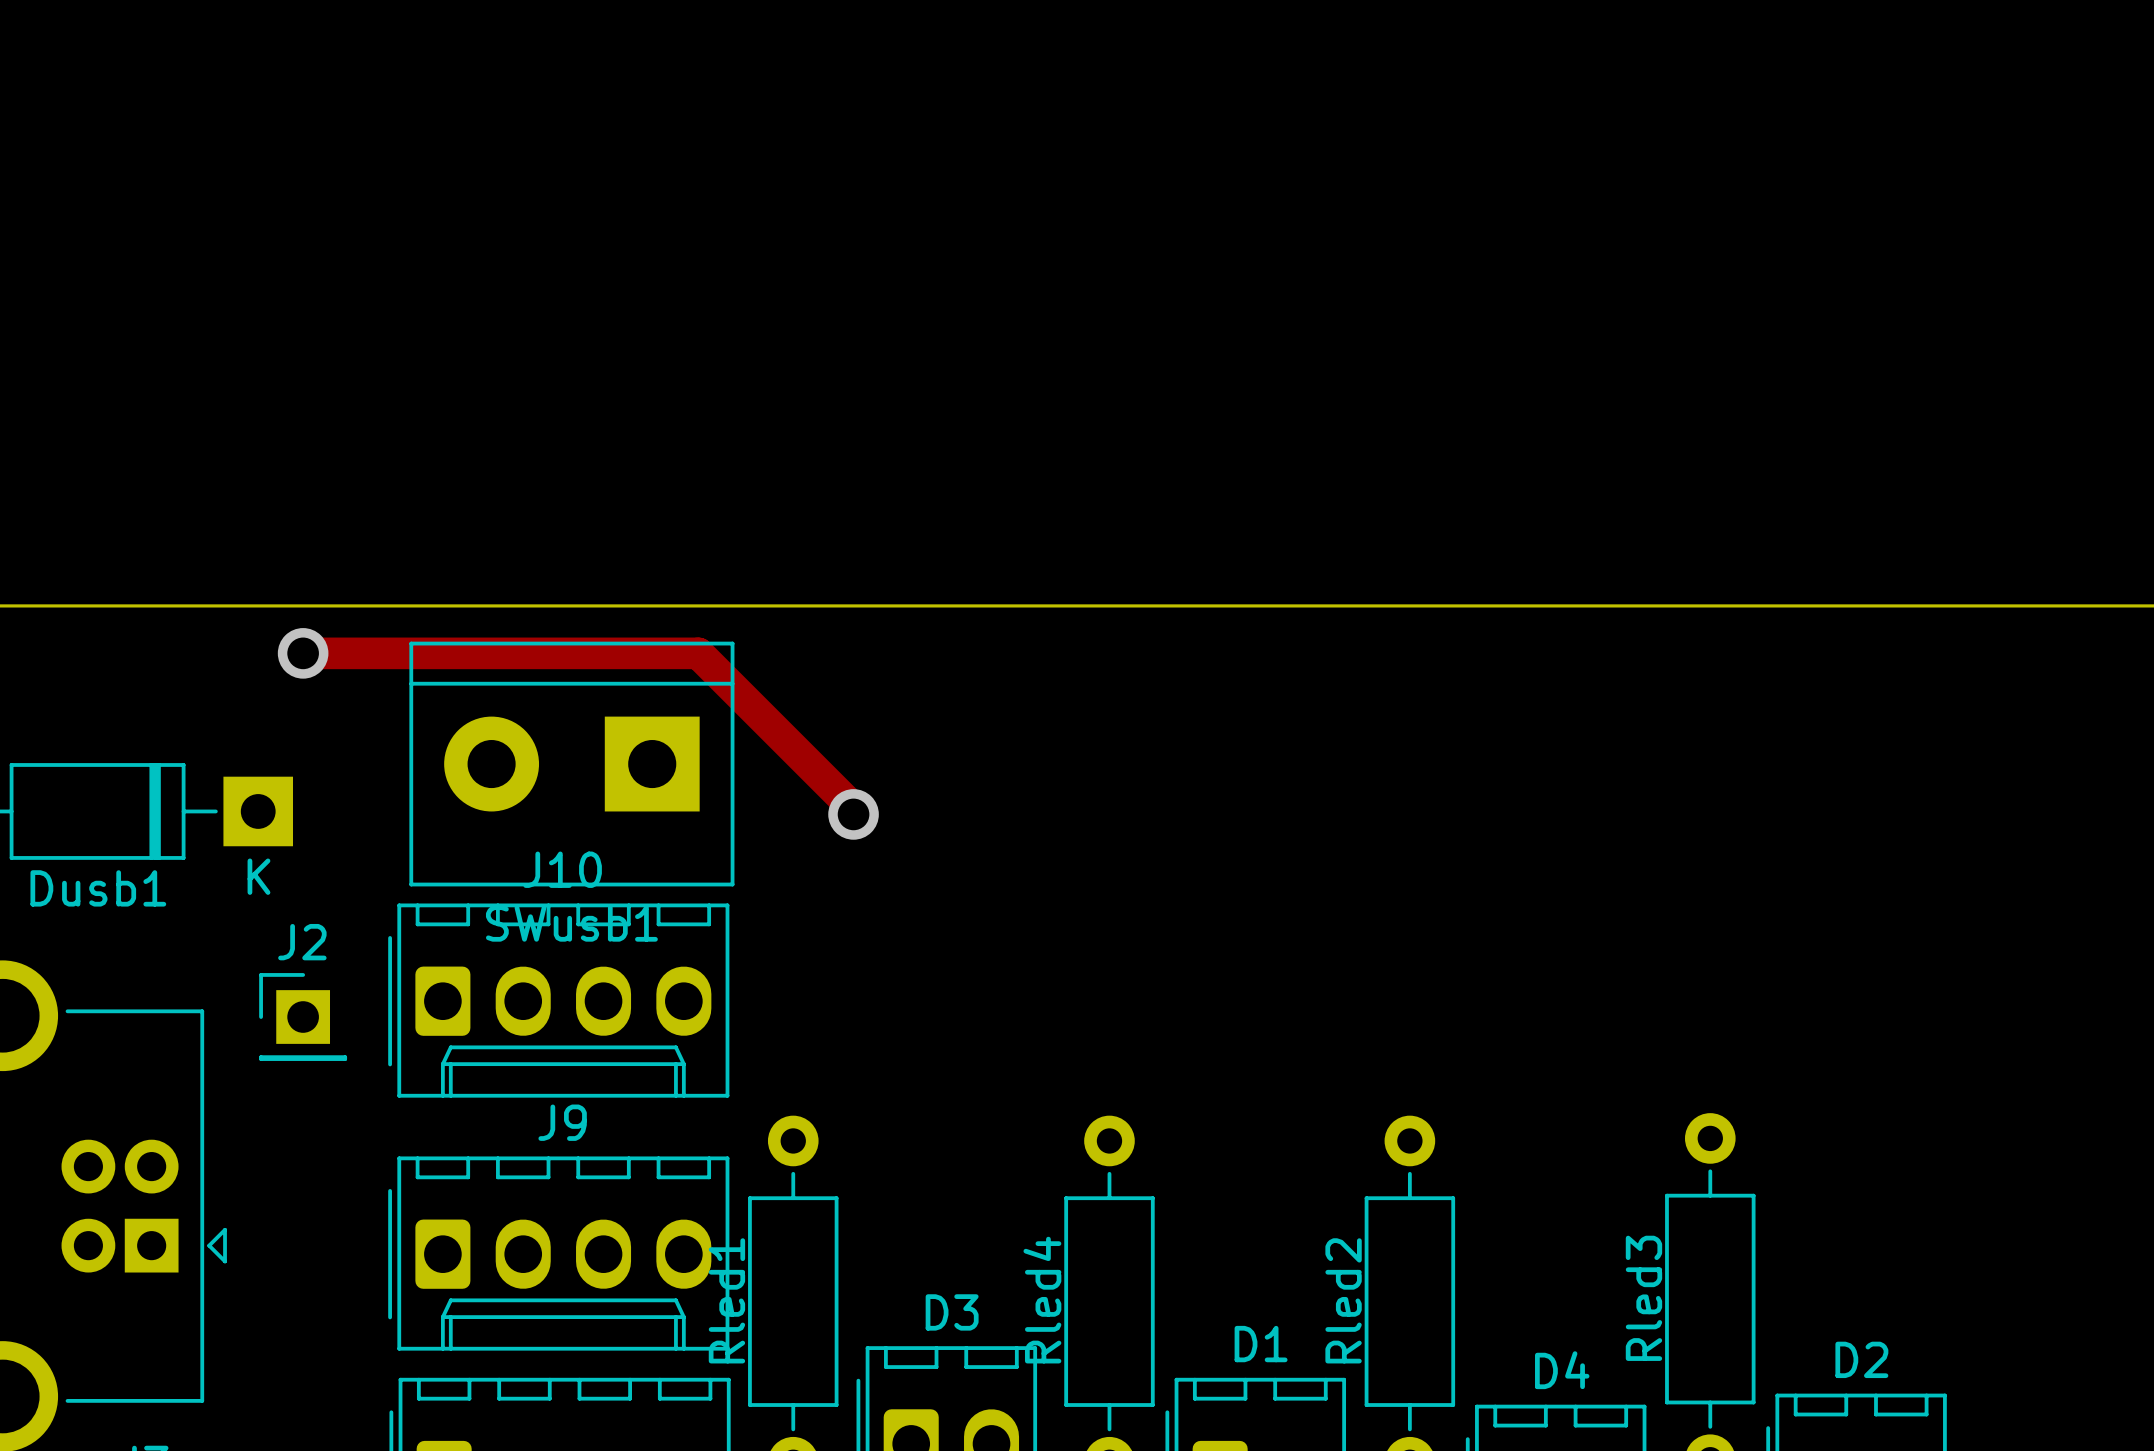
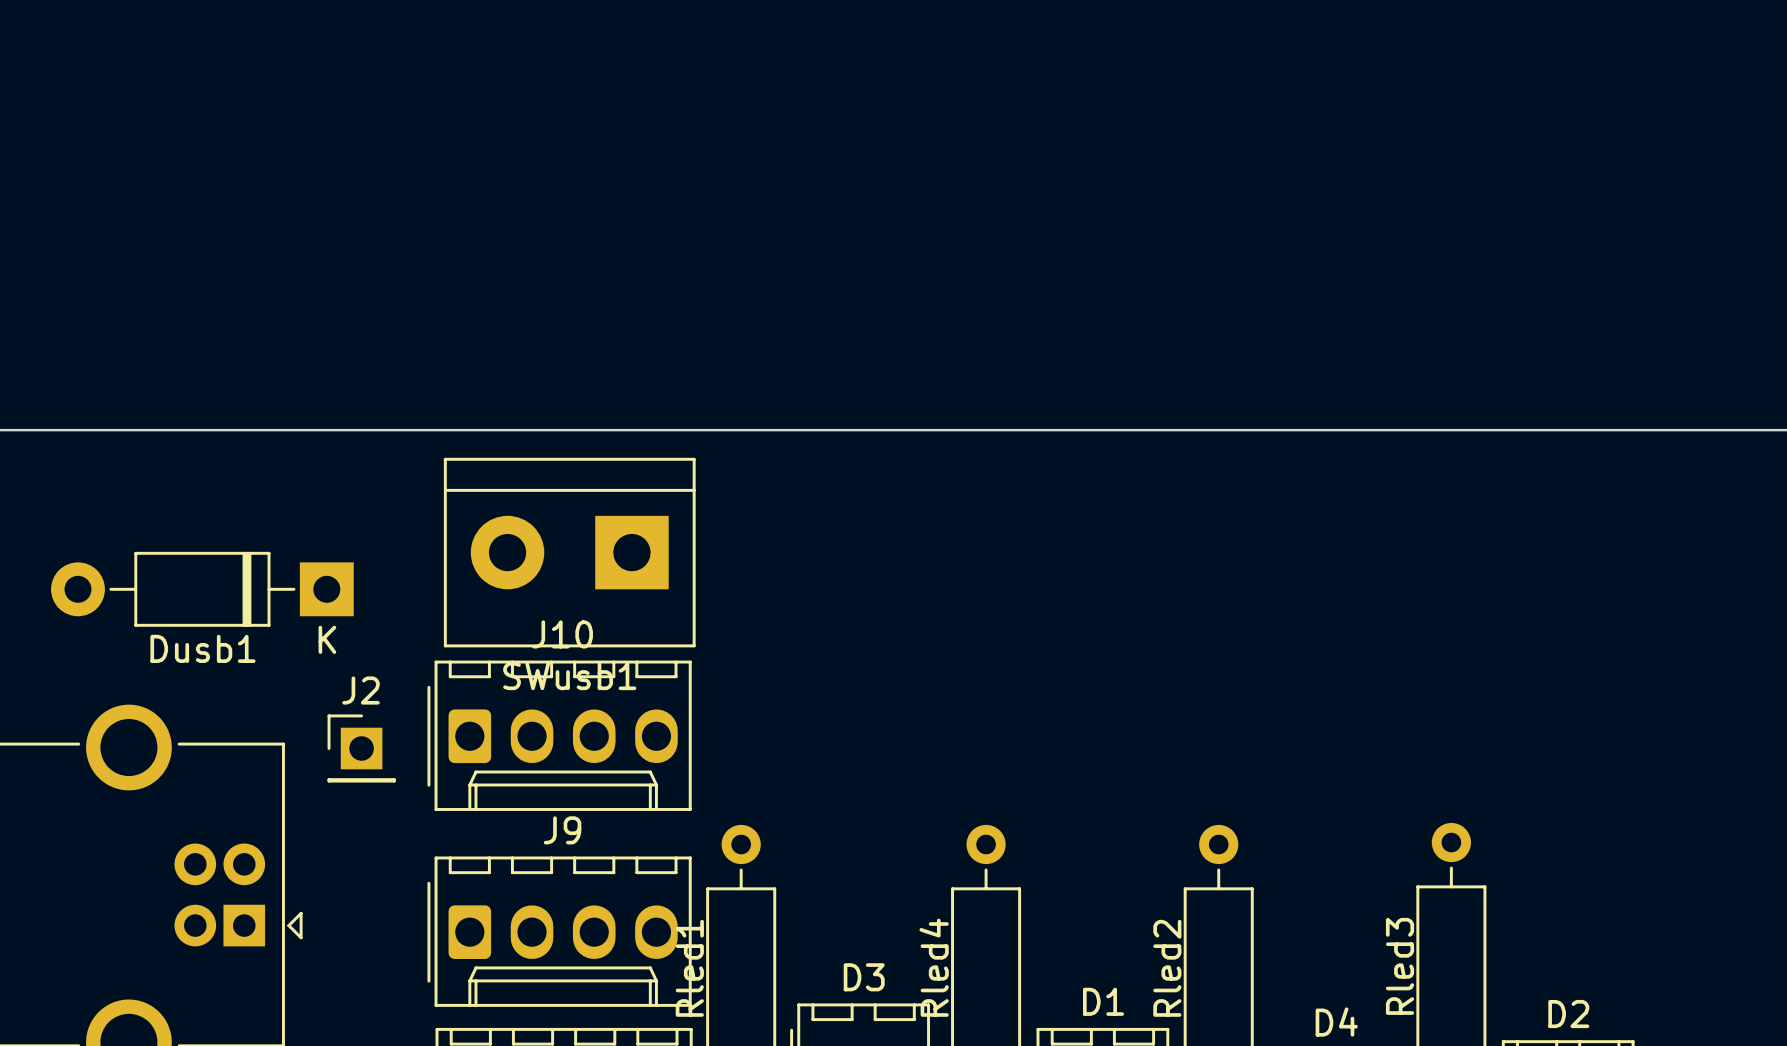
track: (303, 653) (698, 653) (853, 808) (853, 814) -> none
via: (303, 653) -> none
via: (853, 814) -> none

